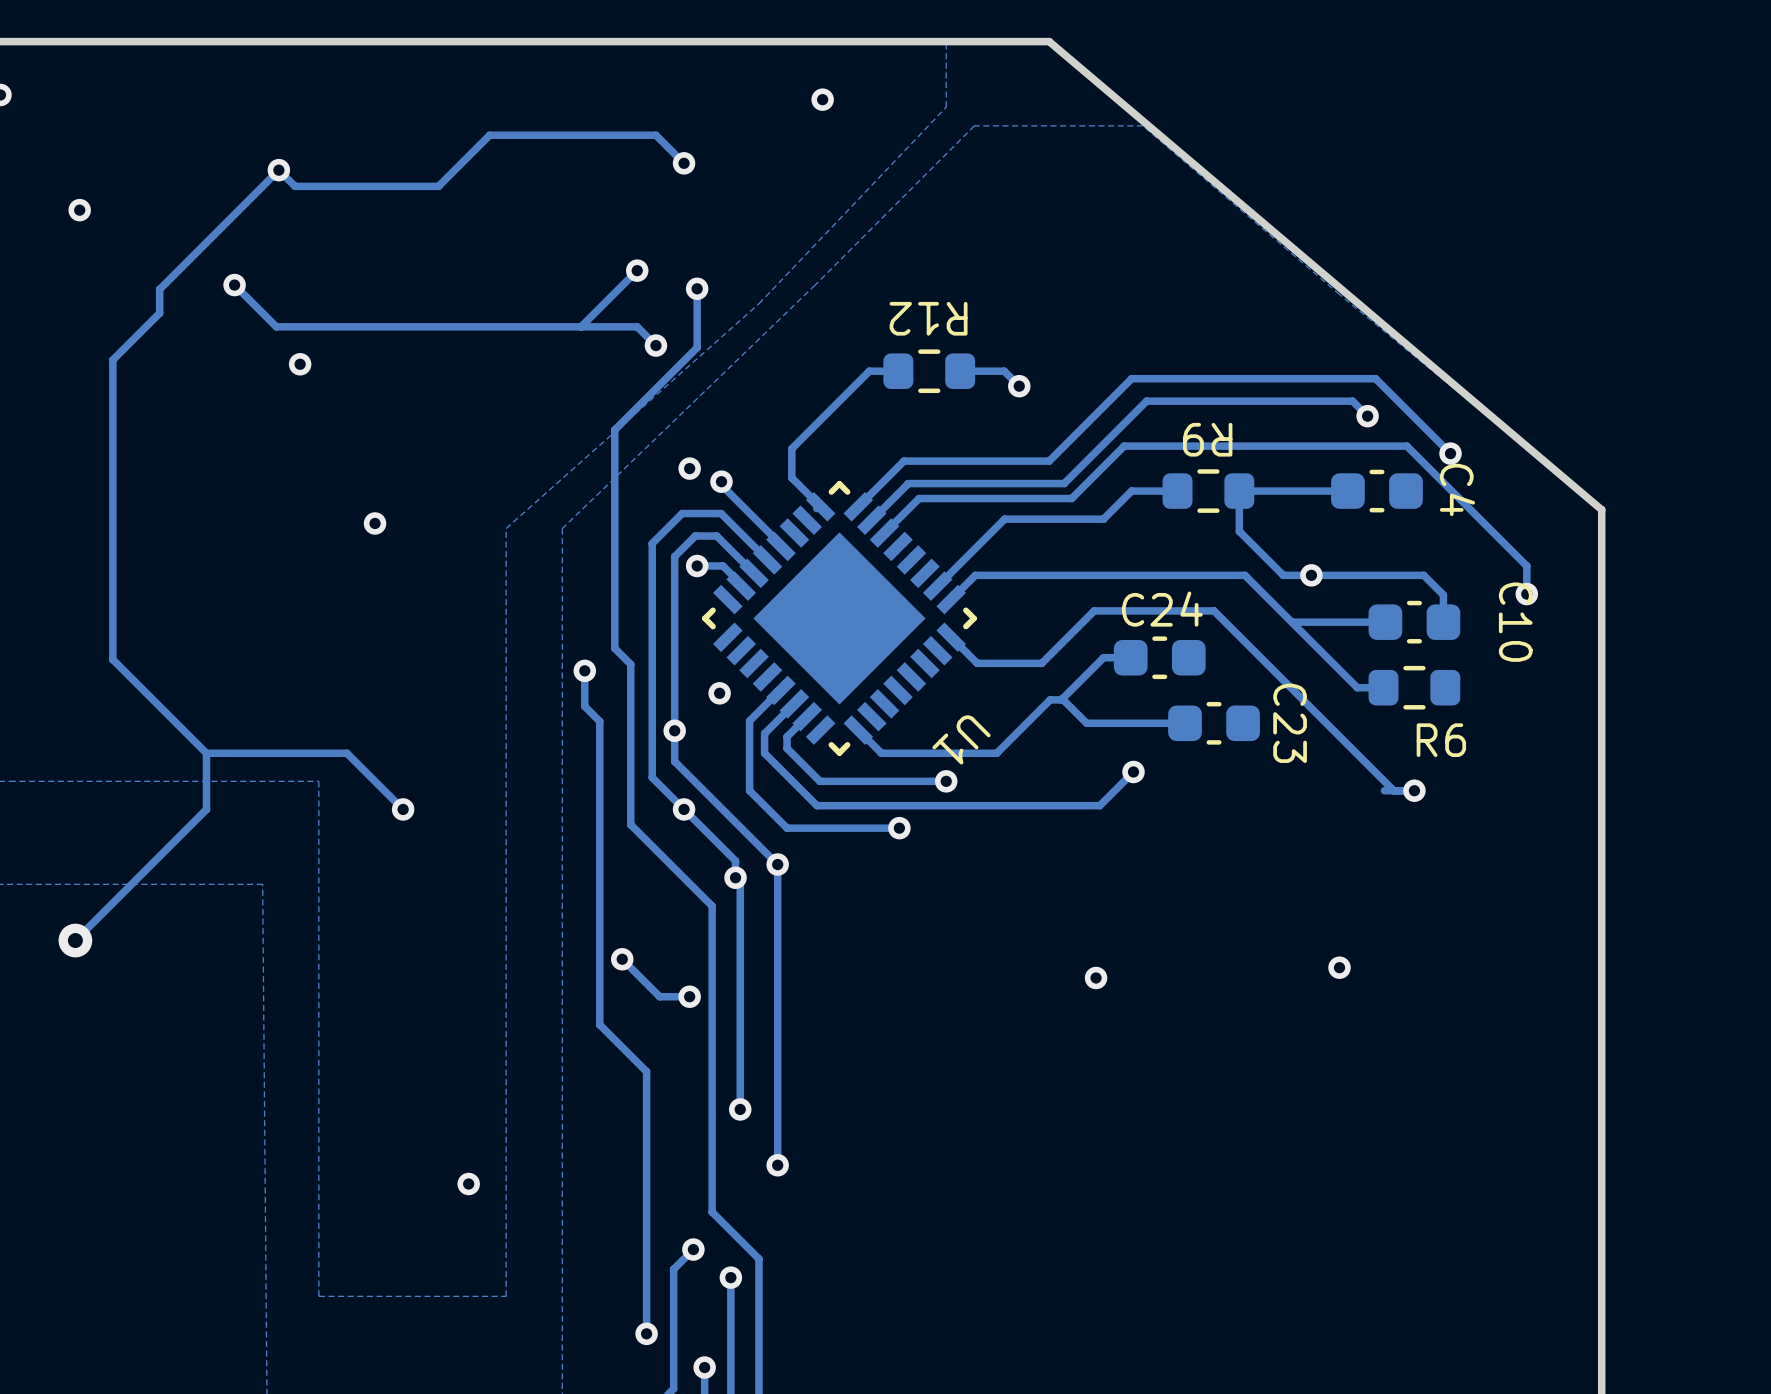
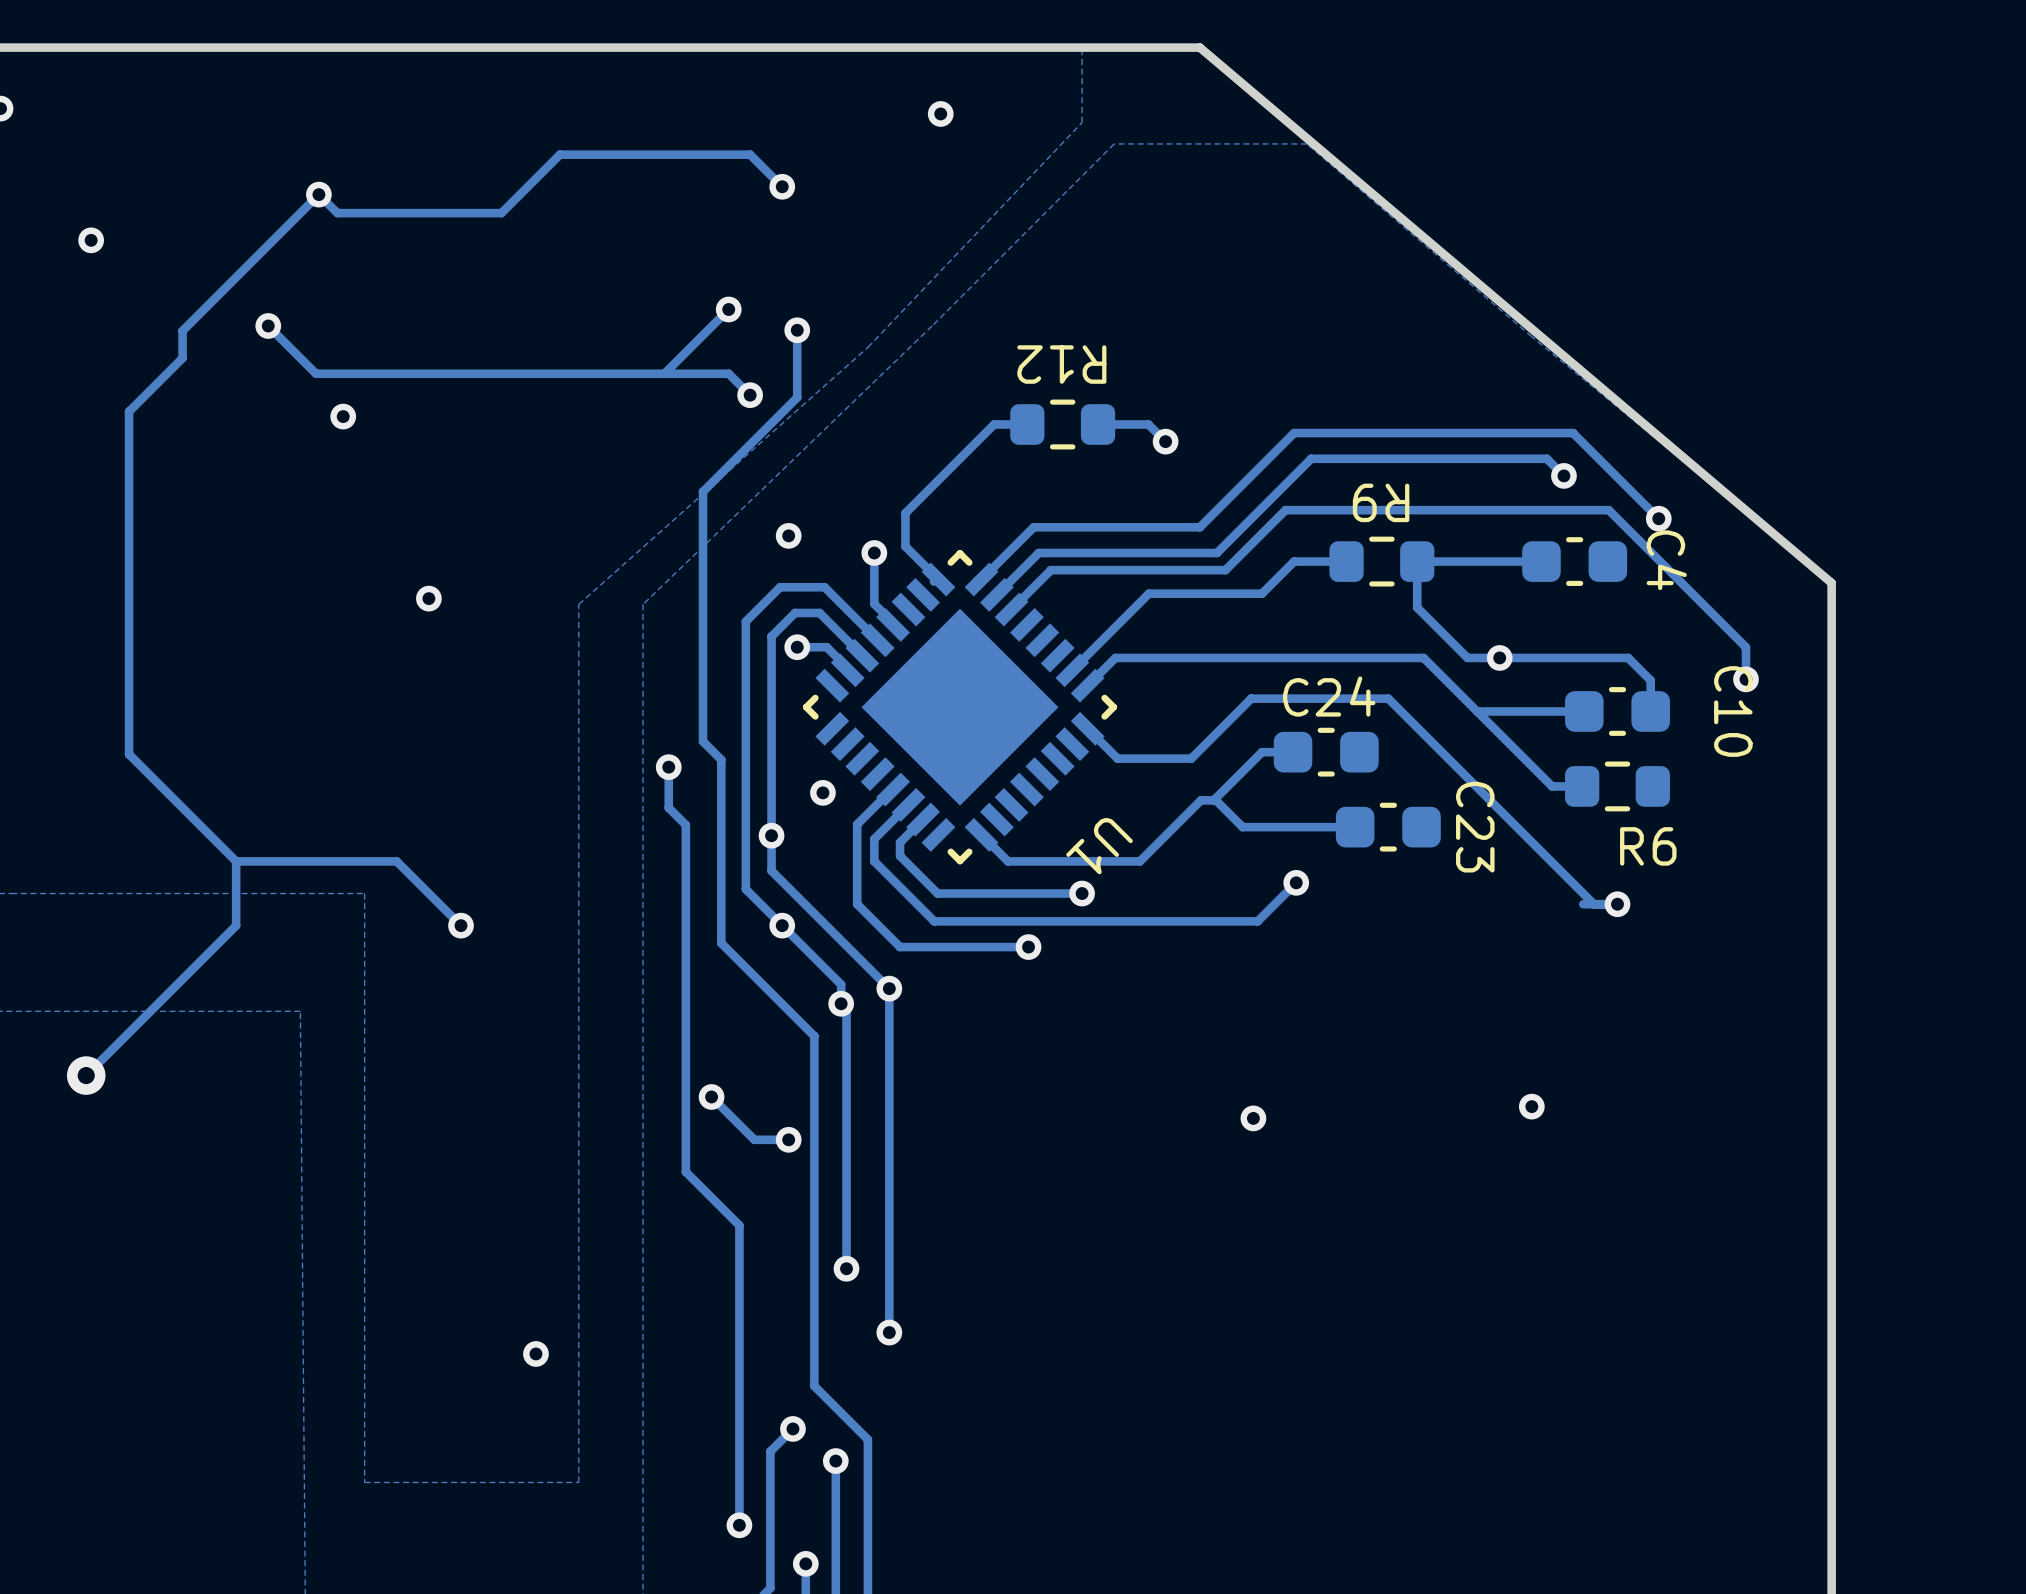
track: (721, 481) (721, 485) (764, 528) -> (874, 553) (874, 604)
via position: (721, 481) -> (874, 553)

